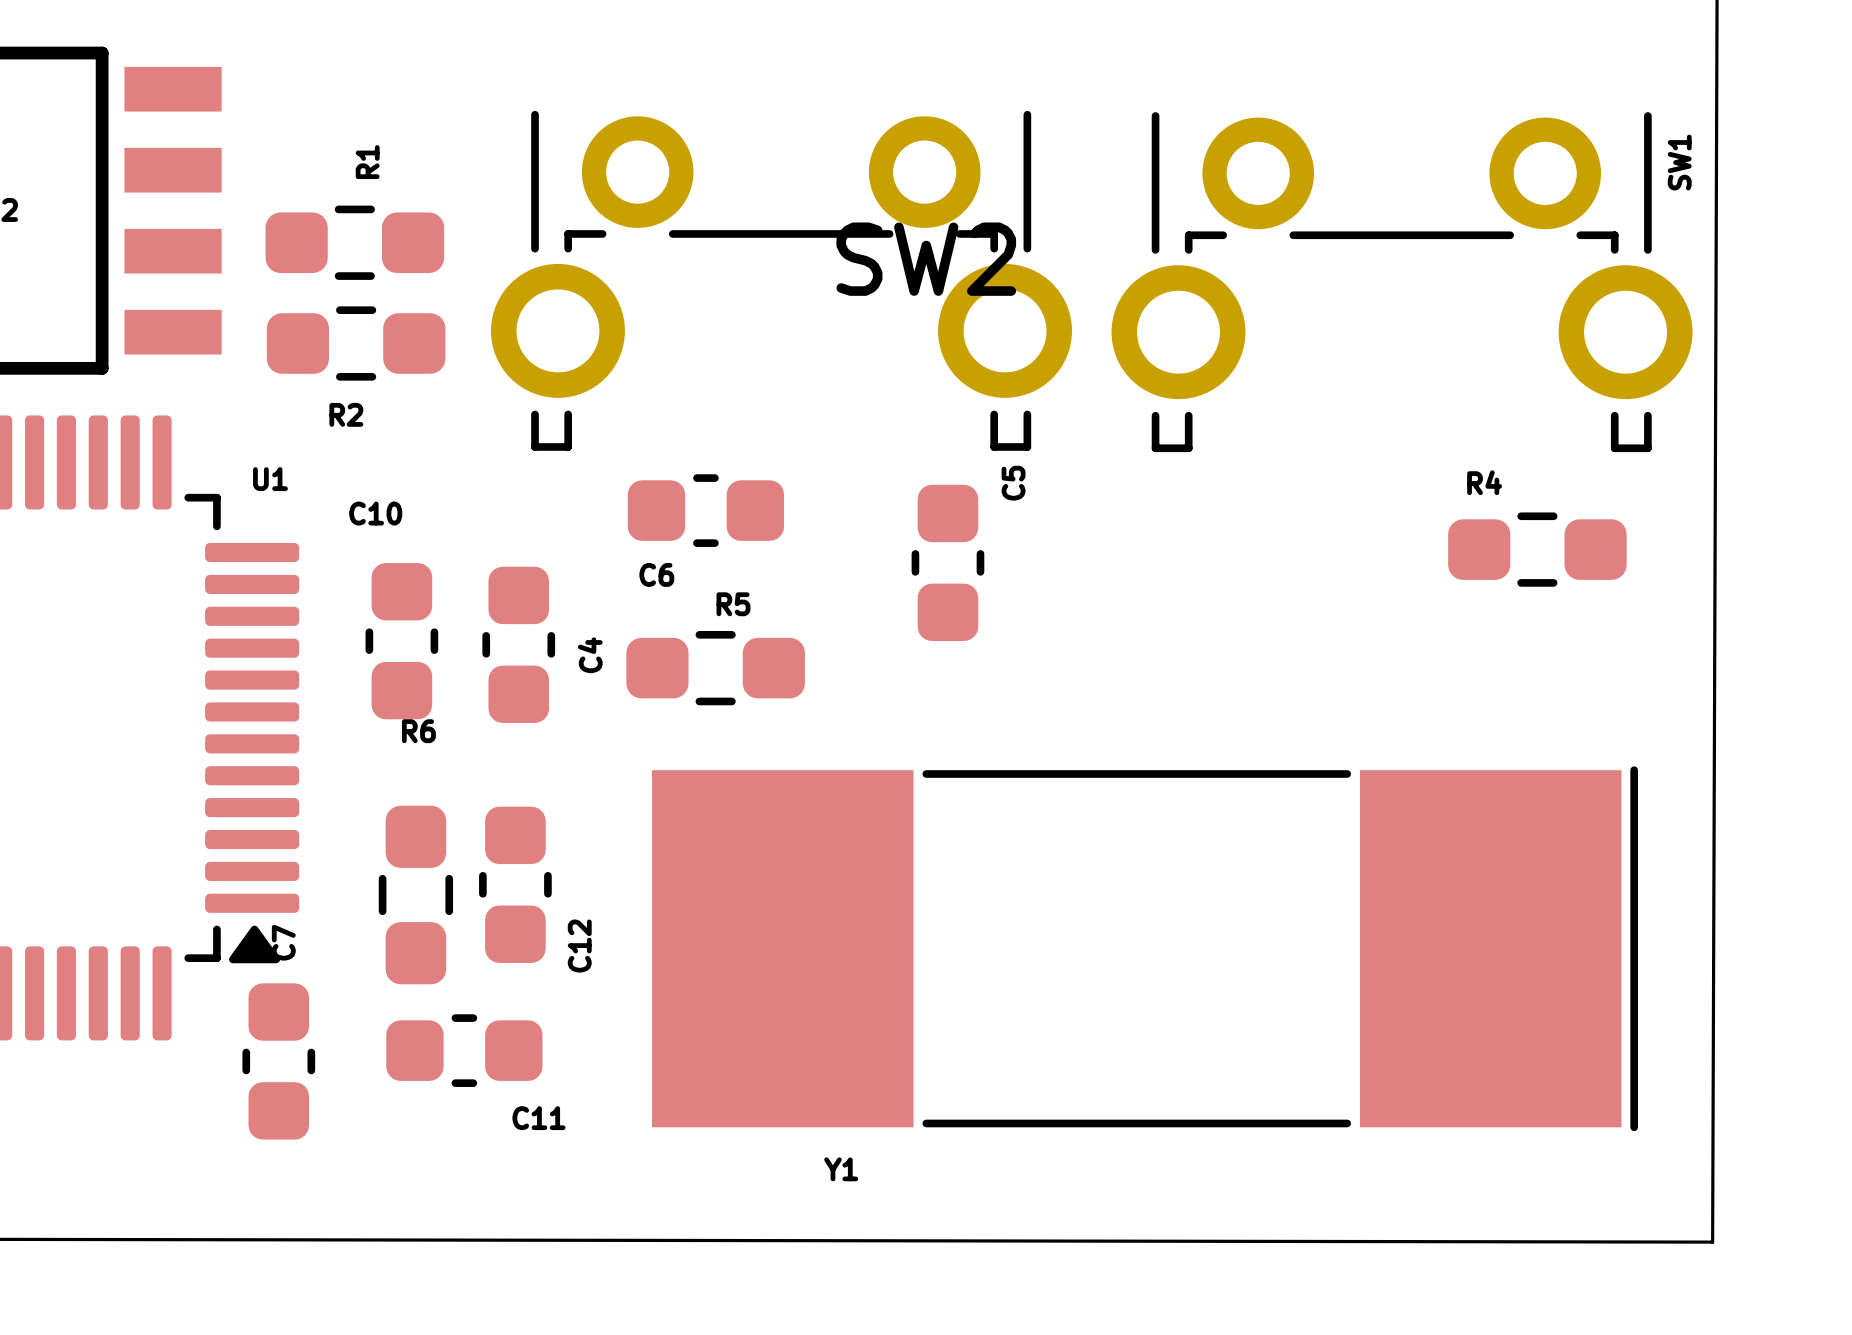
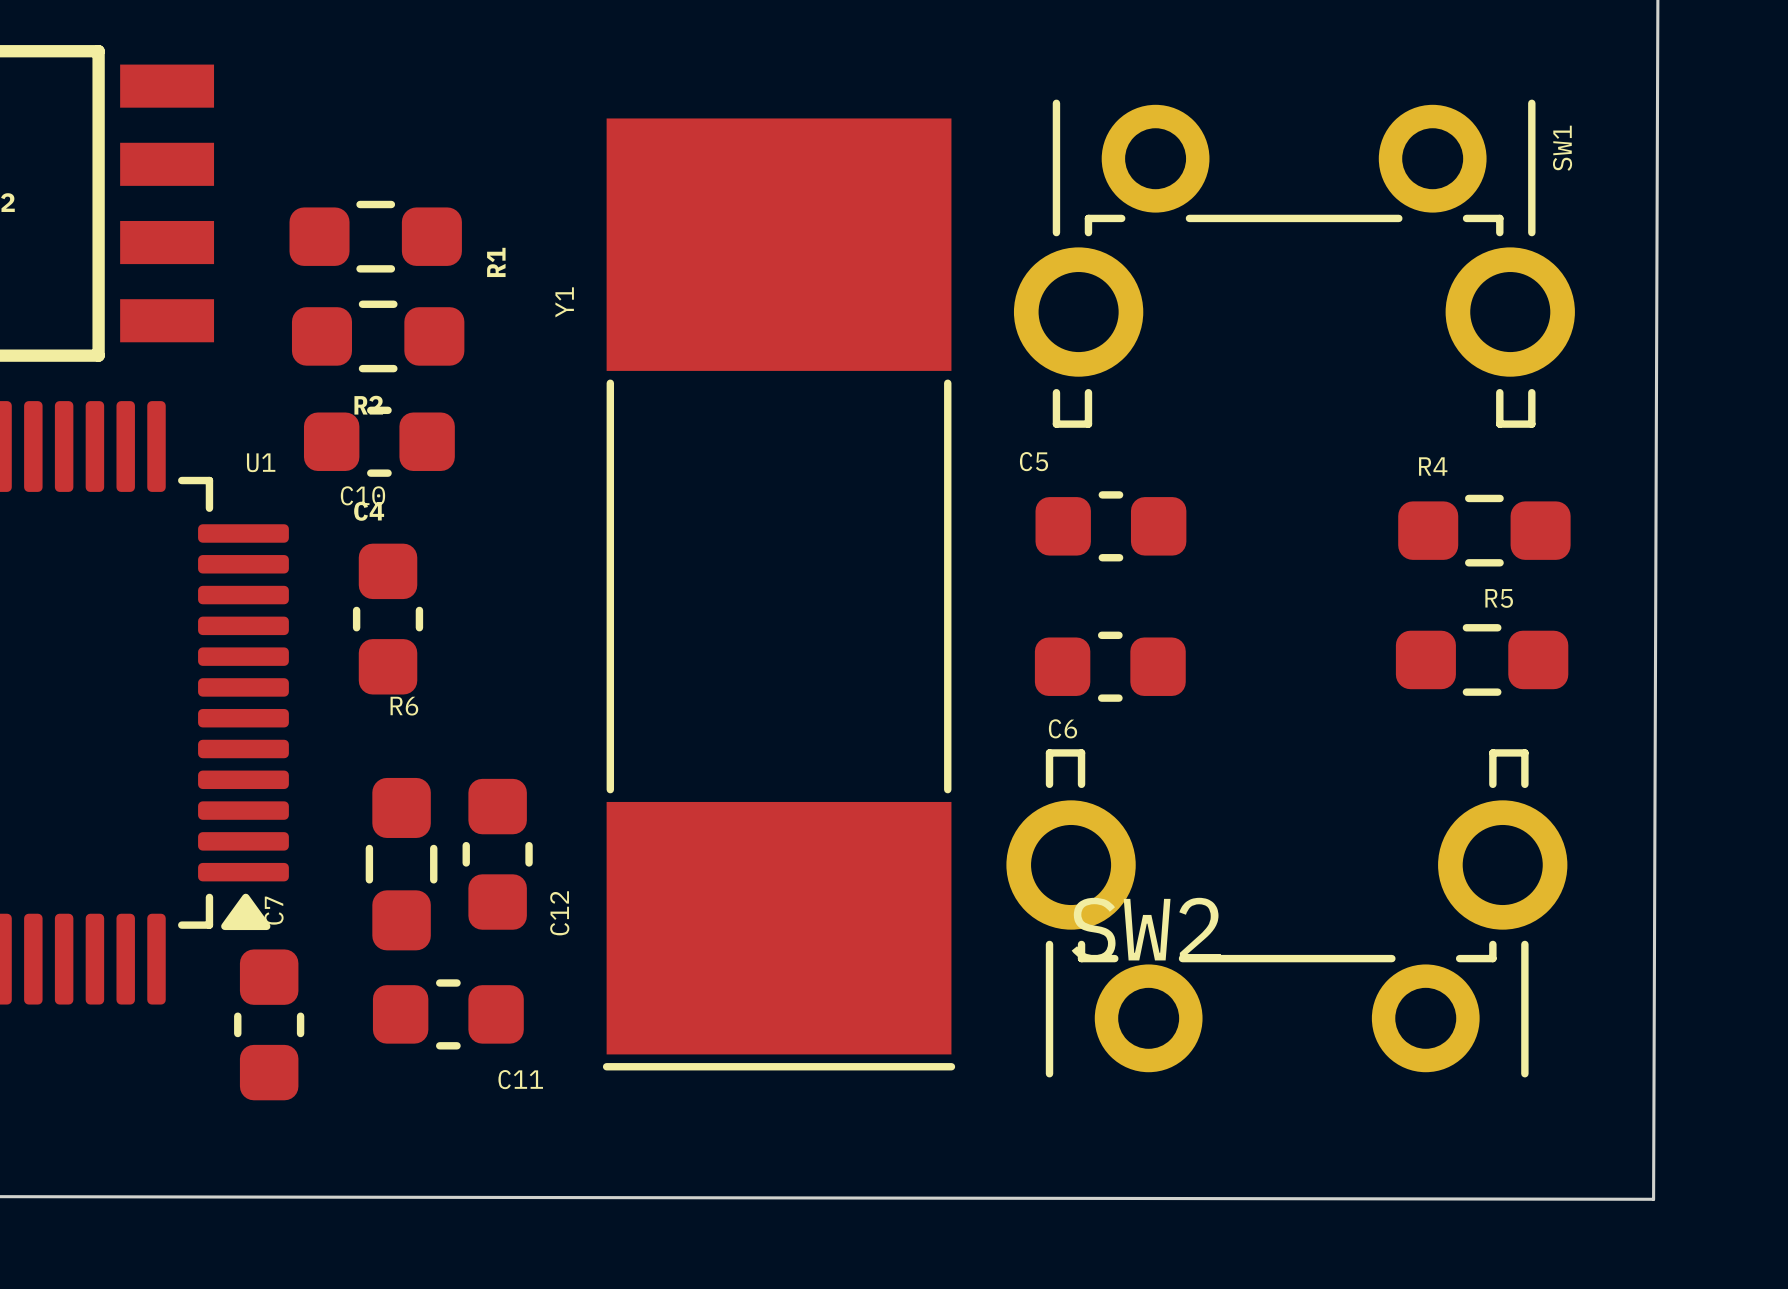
R1 name position: R1 (367, 162) -> R1 (496, 262)
R1 position: (354, 242) -> (375, 236)
SW2 rotation: 0° (781, 280) -> 180° (1286, 913)
SW2 position: (781, 280) -> (1286, 913)
SW1 position: (1402, 282) -> (1294, 263)
R2 position: (356, 343) -> (378, 336)
C5 name position: C5 (1013, 483) -> C5 (1034, 461)
C6 position: (705, 510) -> (1110, 666)
C5 rotation: 0° (947, 562) -> 90° clockwise (1110, 526)
C5 position: (947, 562) -> (1110, 526)
C4 rotation: 0° (518, 644) -> 90° clockwise (379, 441)
C4 position: (518, 644) -> (379, 441)
R5 position: (715, 668) -> (1482, 659)
Y1 rotation: 0° (1145, 948) -> 90° clockwise (779, 594)

